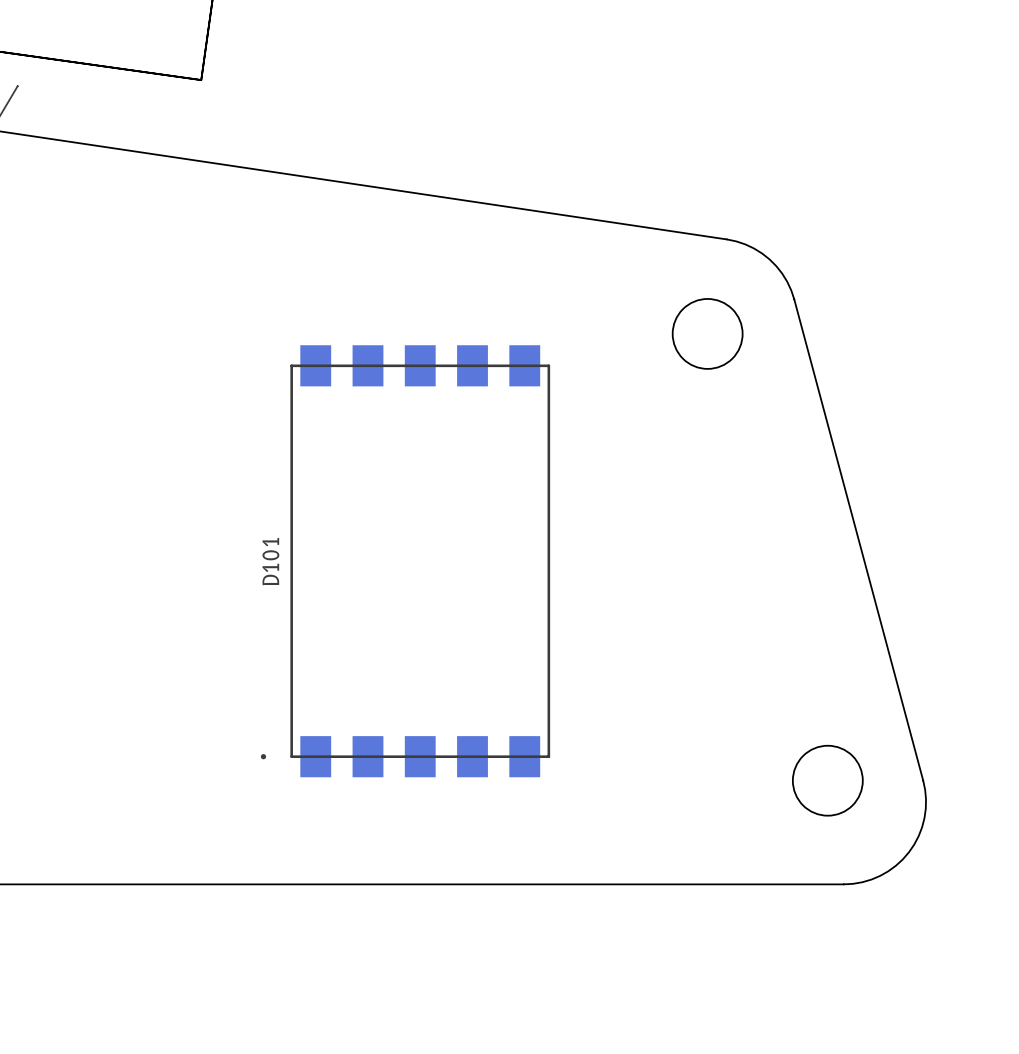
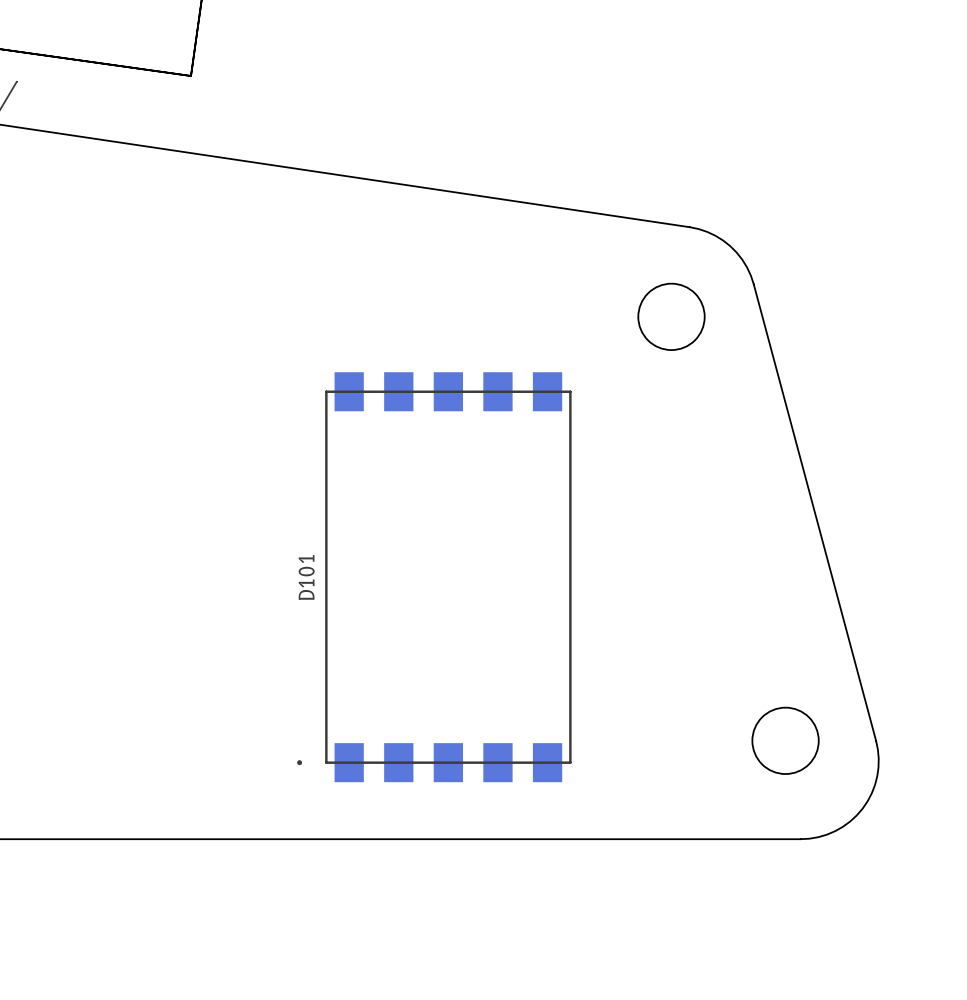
D101 position: (405, 561) -> (434, 577)

